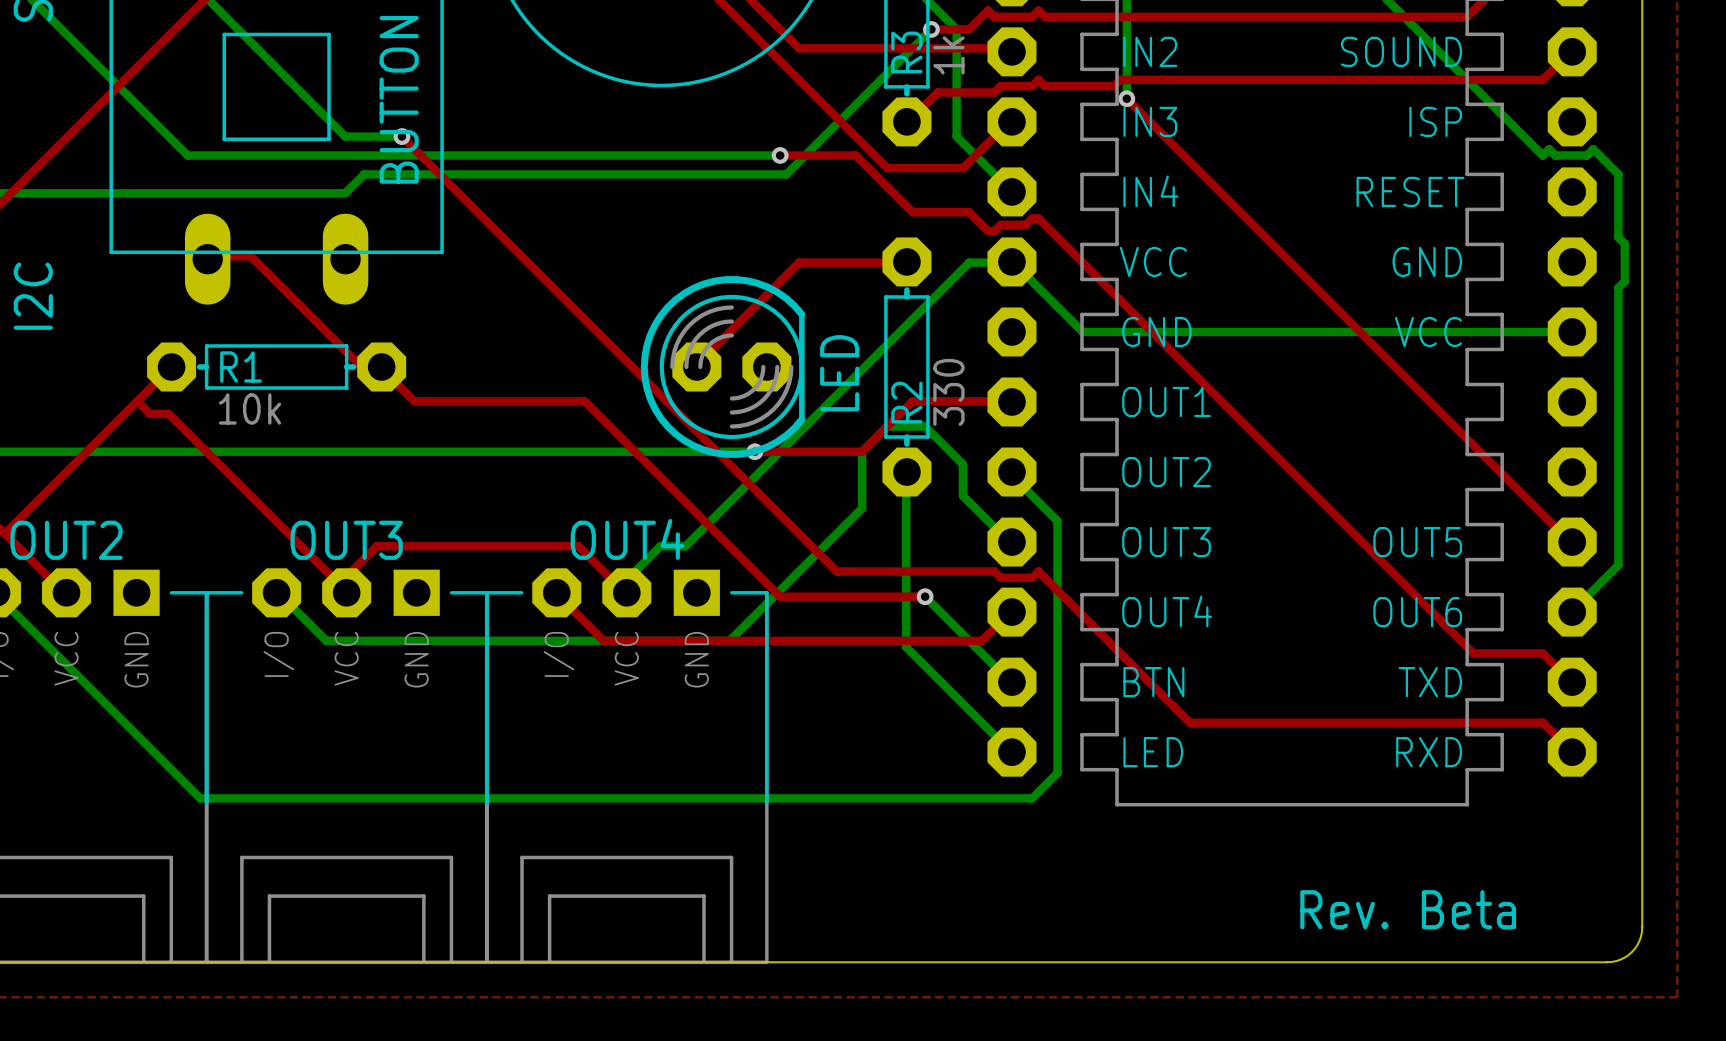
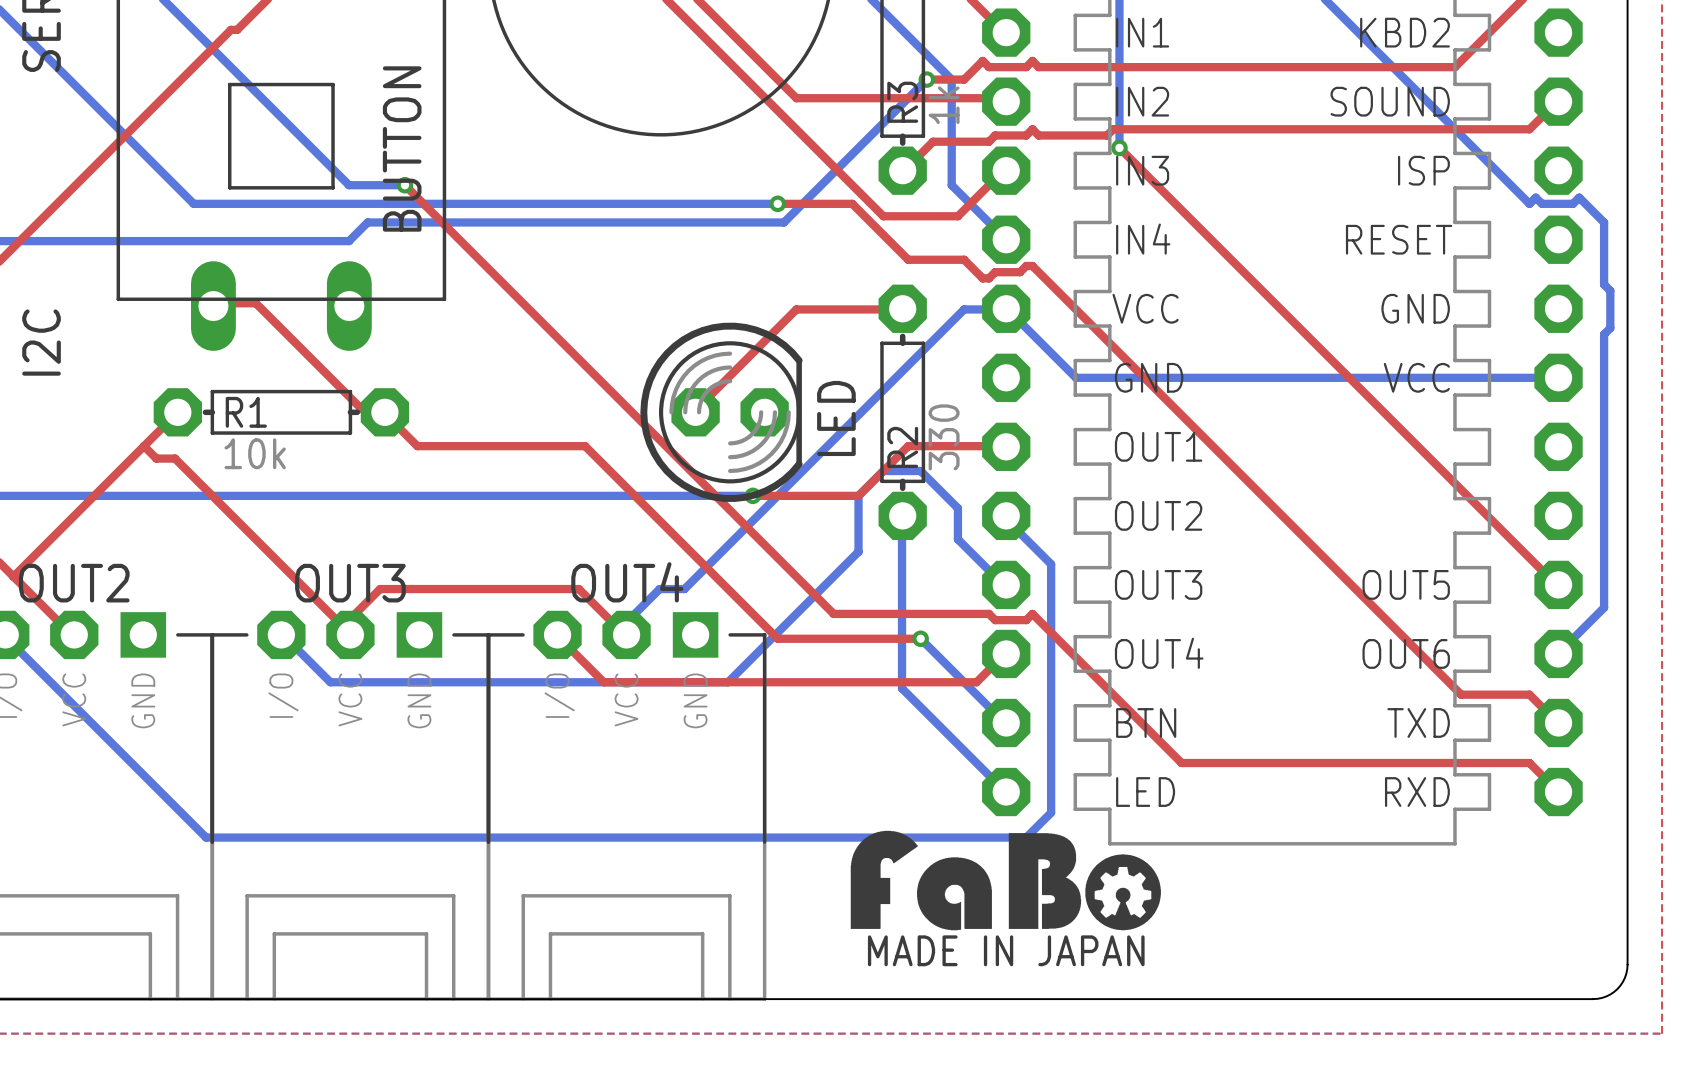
drawing: none -> [850, 830, 1161, 931]
text: Rev. Beta (1408, 909) -> none
text: none -> MADE IN JAPAN (1006, 950)

